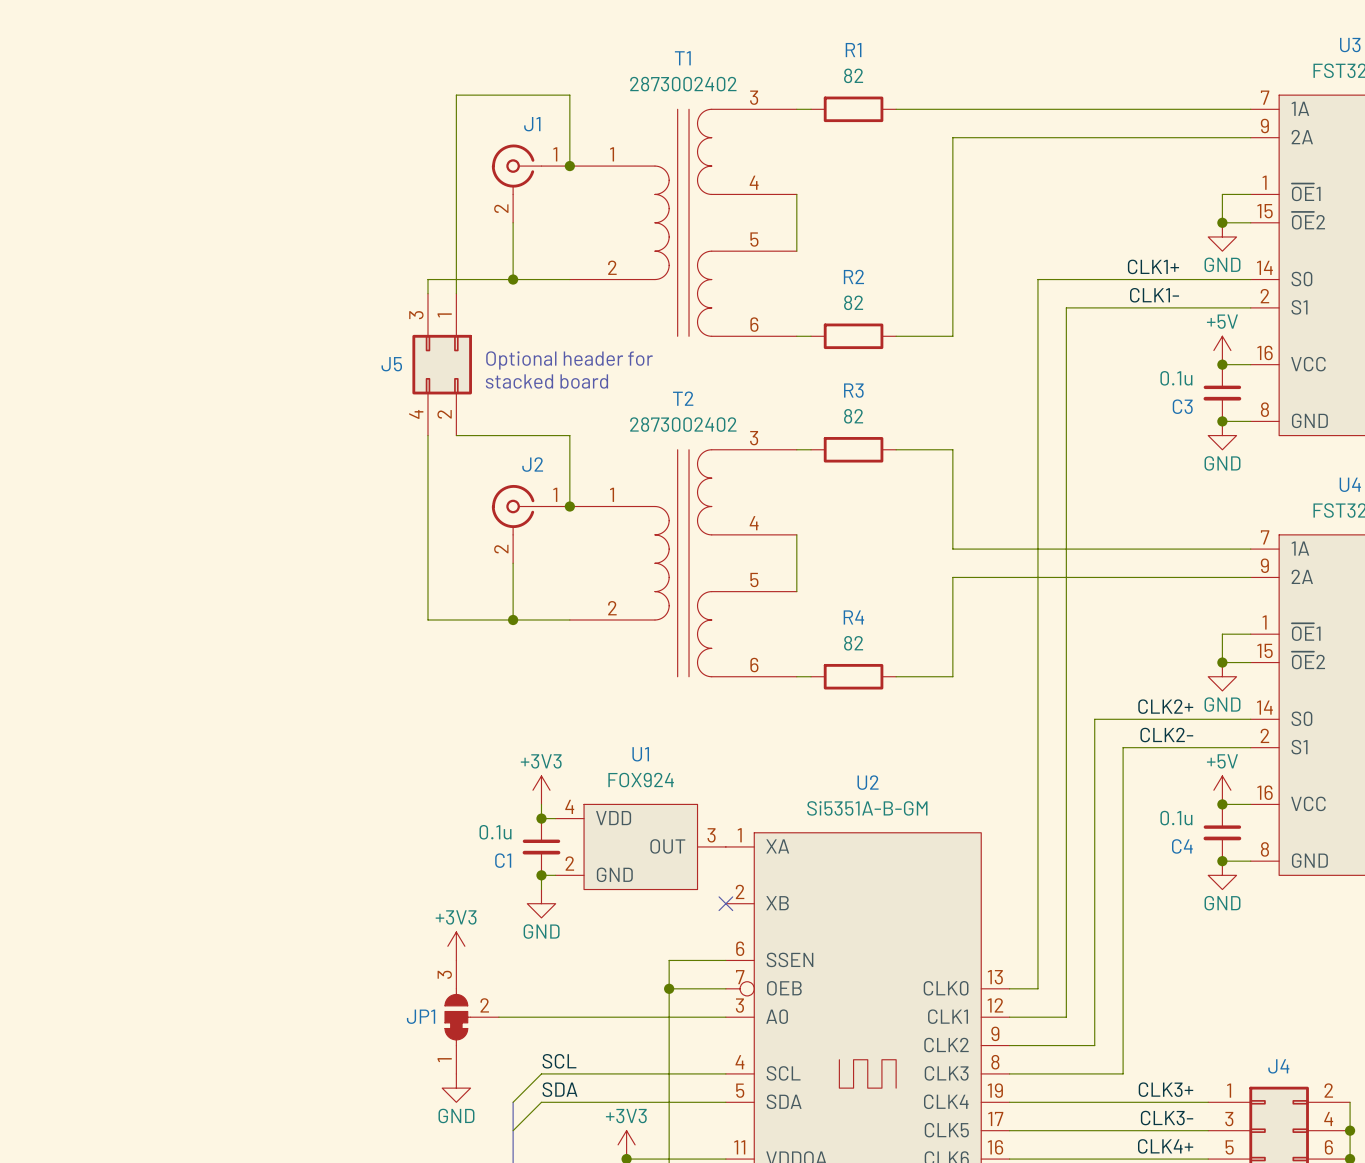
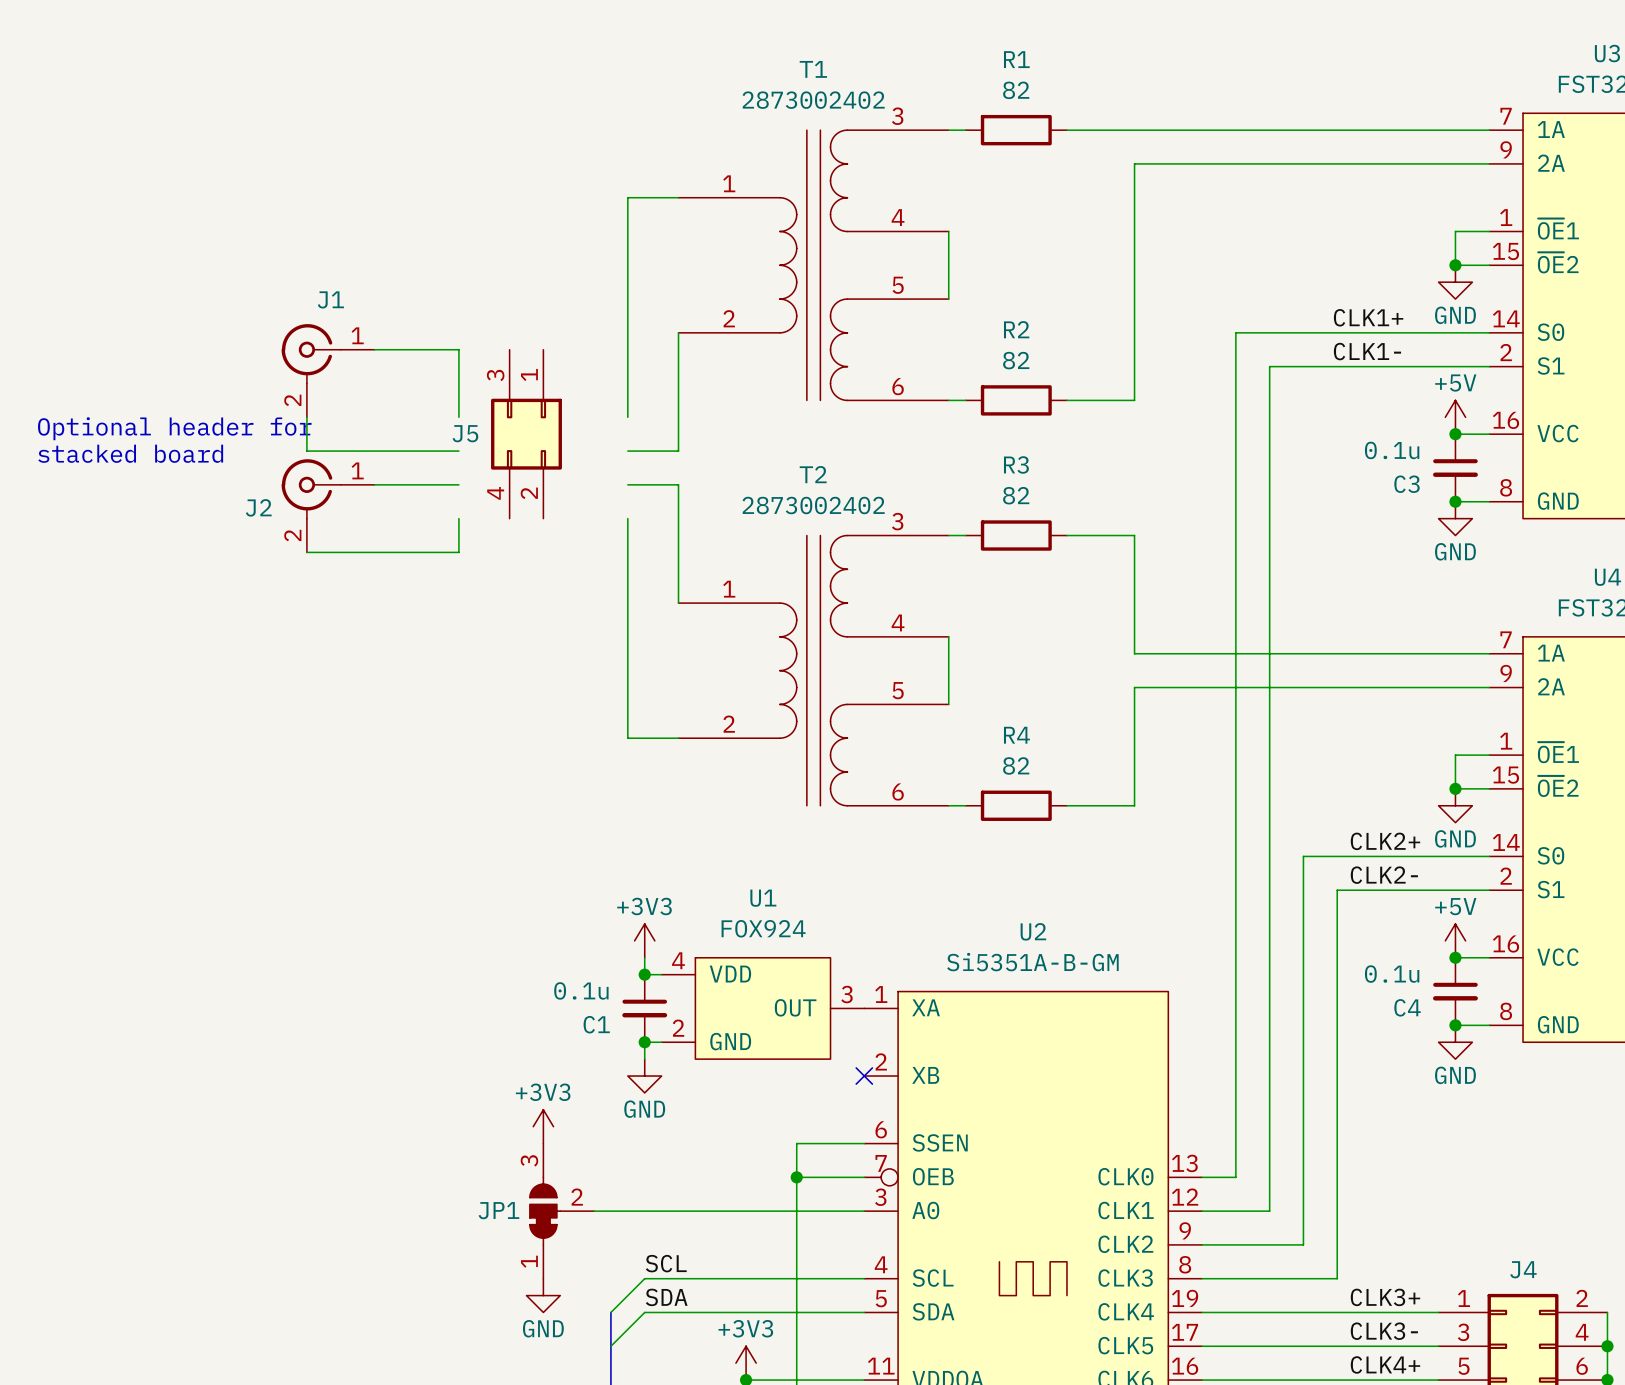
wire: (569, 166) (569, 95) (456, 95) (456, 293) -> (678, 197) (627, 197) (627, 417)
junction: (569, 166) -> none
J1 position: (530, 183) -> (328, 370)
wire: (513, 222) (513, 279) -> none
junction: (513, 279) -> none
wire: (569, 279) (427, 279) (427, 293) -> (678, 332) (678, 451) (627, 451)
wire: none -> (374, 349) (458, 349) (458, 417)
wire: none -> (306, 417) (306, 451) (458, 451)
text: none -> Optional header for (174, 428)
text: Optional header for (569, 360) -> none
text: none -> stacked board (130, 453)
text: stacked board (546, 381) -> none
wire: none -> (374, 484) (458, 484)
wire: none -> (458, 518) (458, 552) (306, 552)
wire: (427, 435) (427, 620) (527, 620) -> (627, 518) (627, 738)
wire: (456, 435) (569, 435) -> (627, 484) (678, 484) (678, 518)
J2 name position: J2 (532, 464) -> J2 (258, 507)
junction: (569, 506) -> none
J2 position: (530, 524) -> (328, 505)
wire: (513, 563) (513, 620) -> none
junction: (513, 620) -> none

